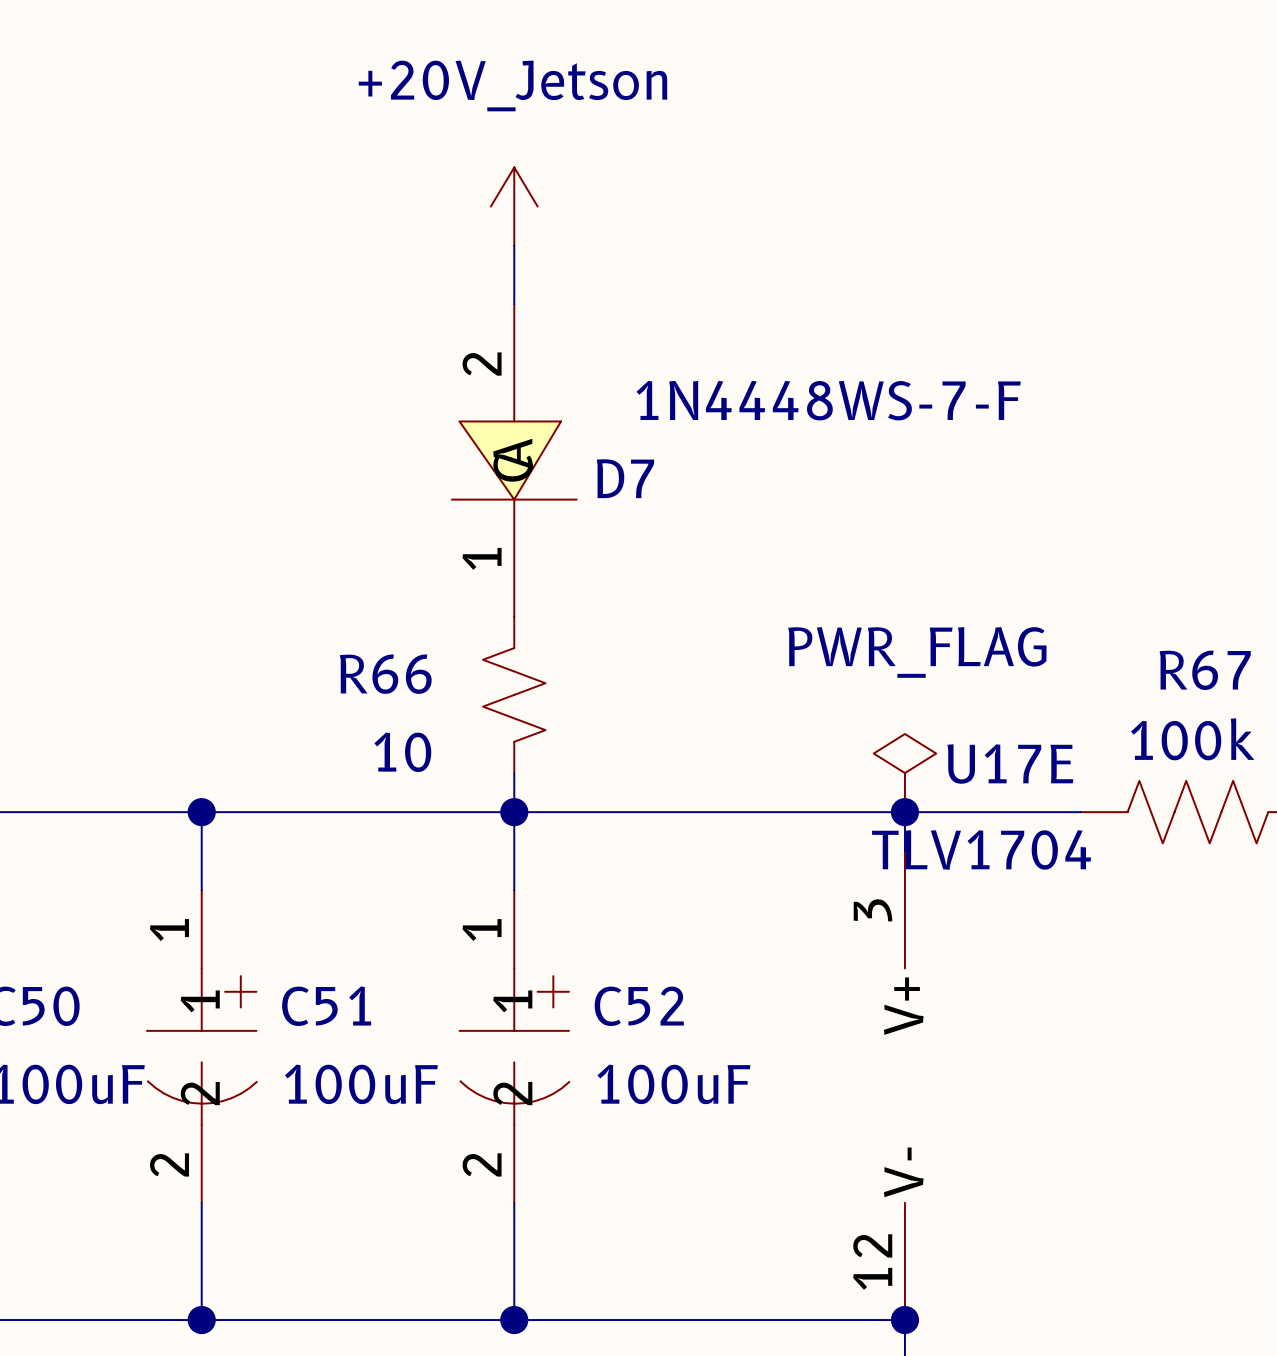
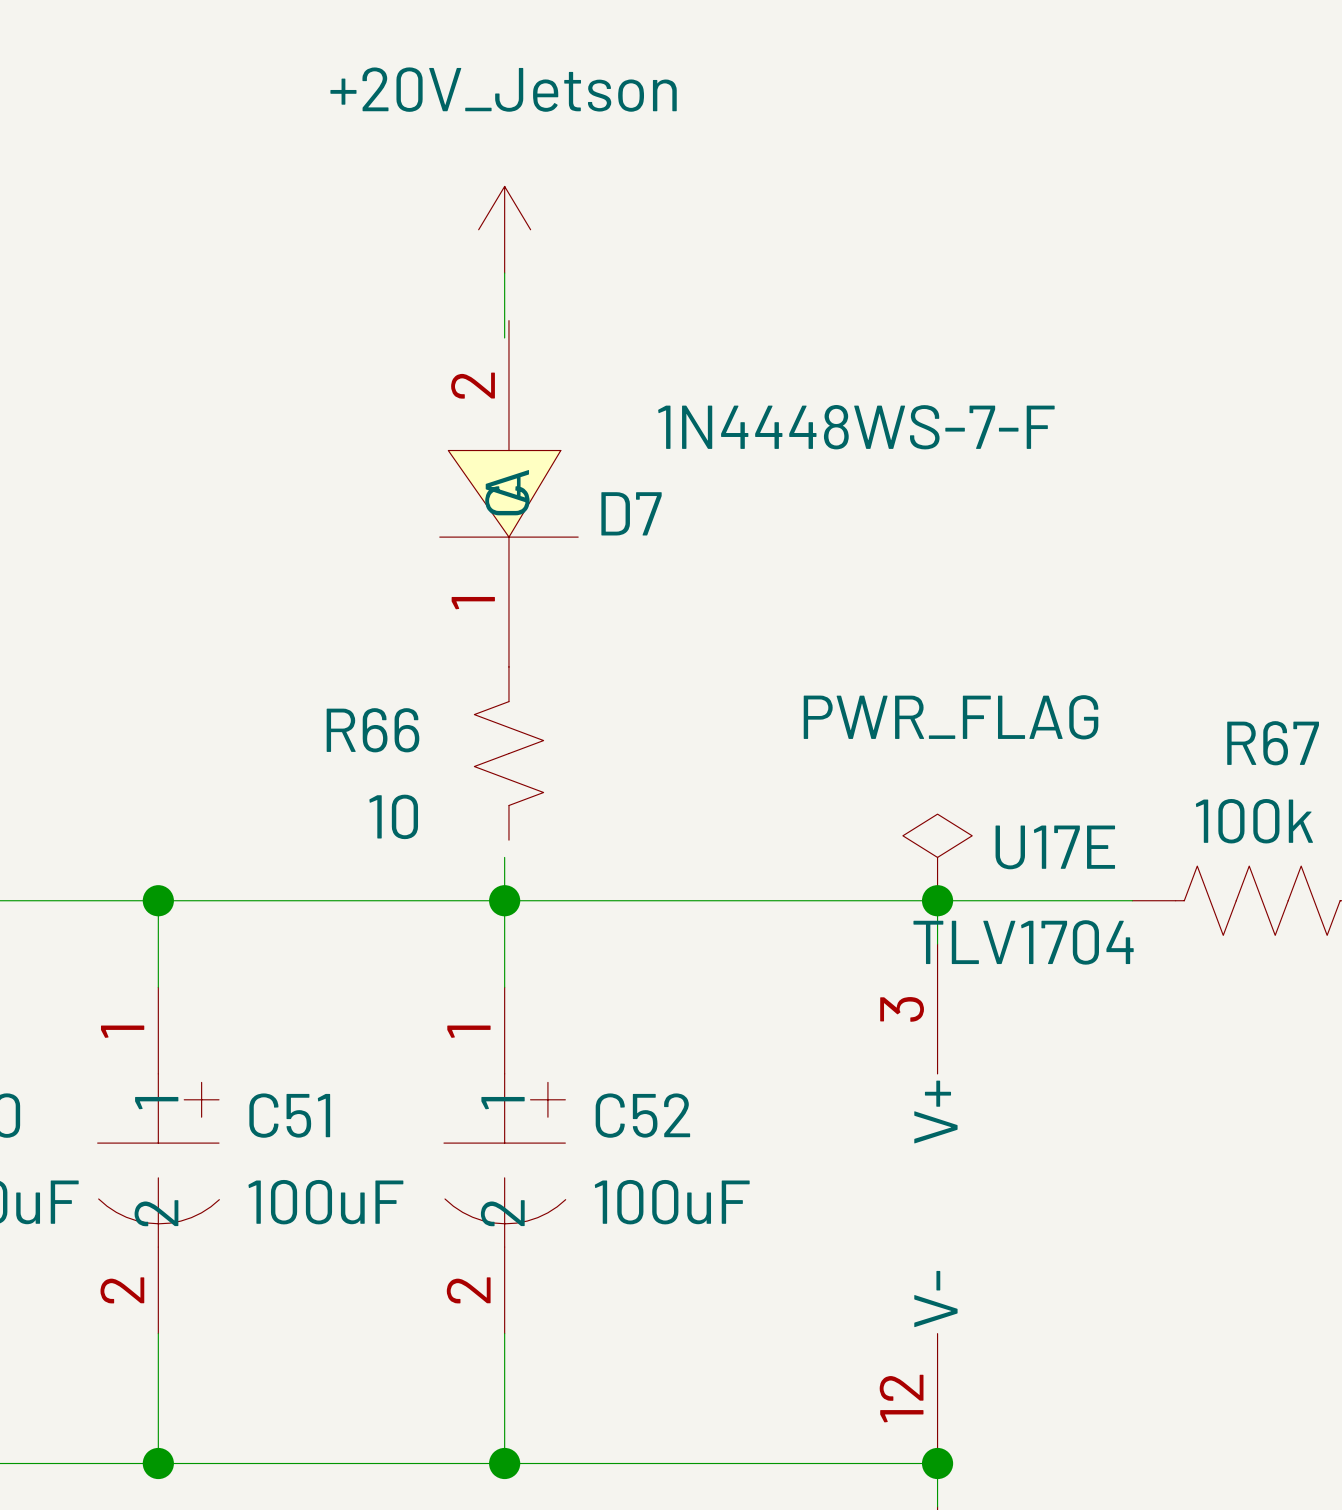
D7 position: (514, 460) -> (508, 493)
R66 position: (514, 694) -> (508, 753)

